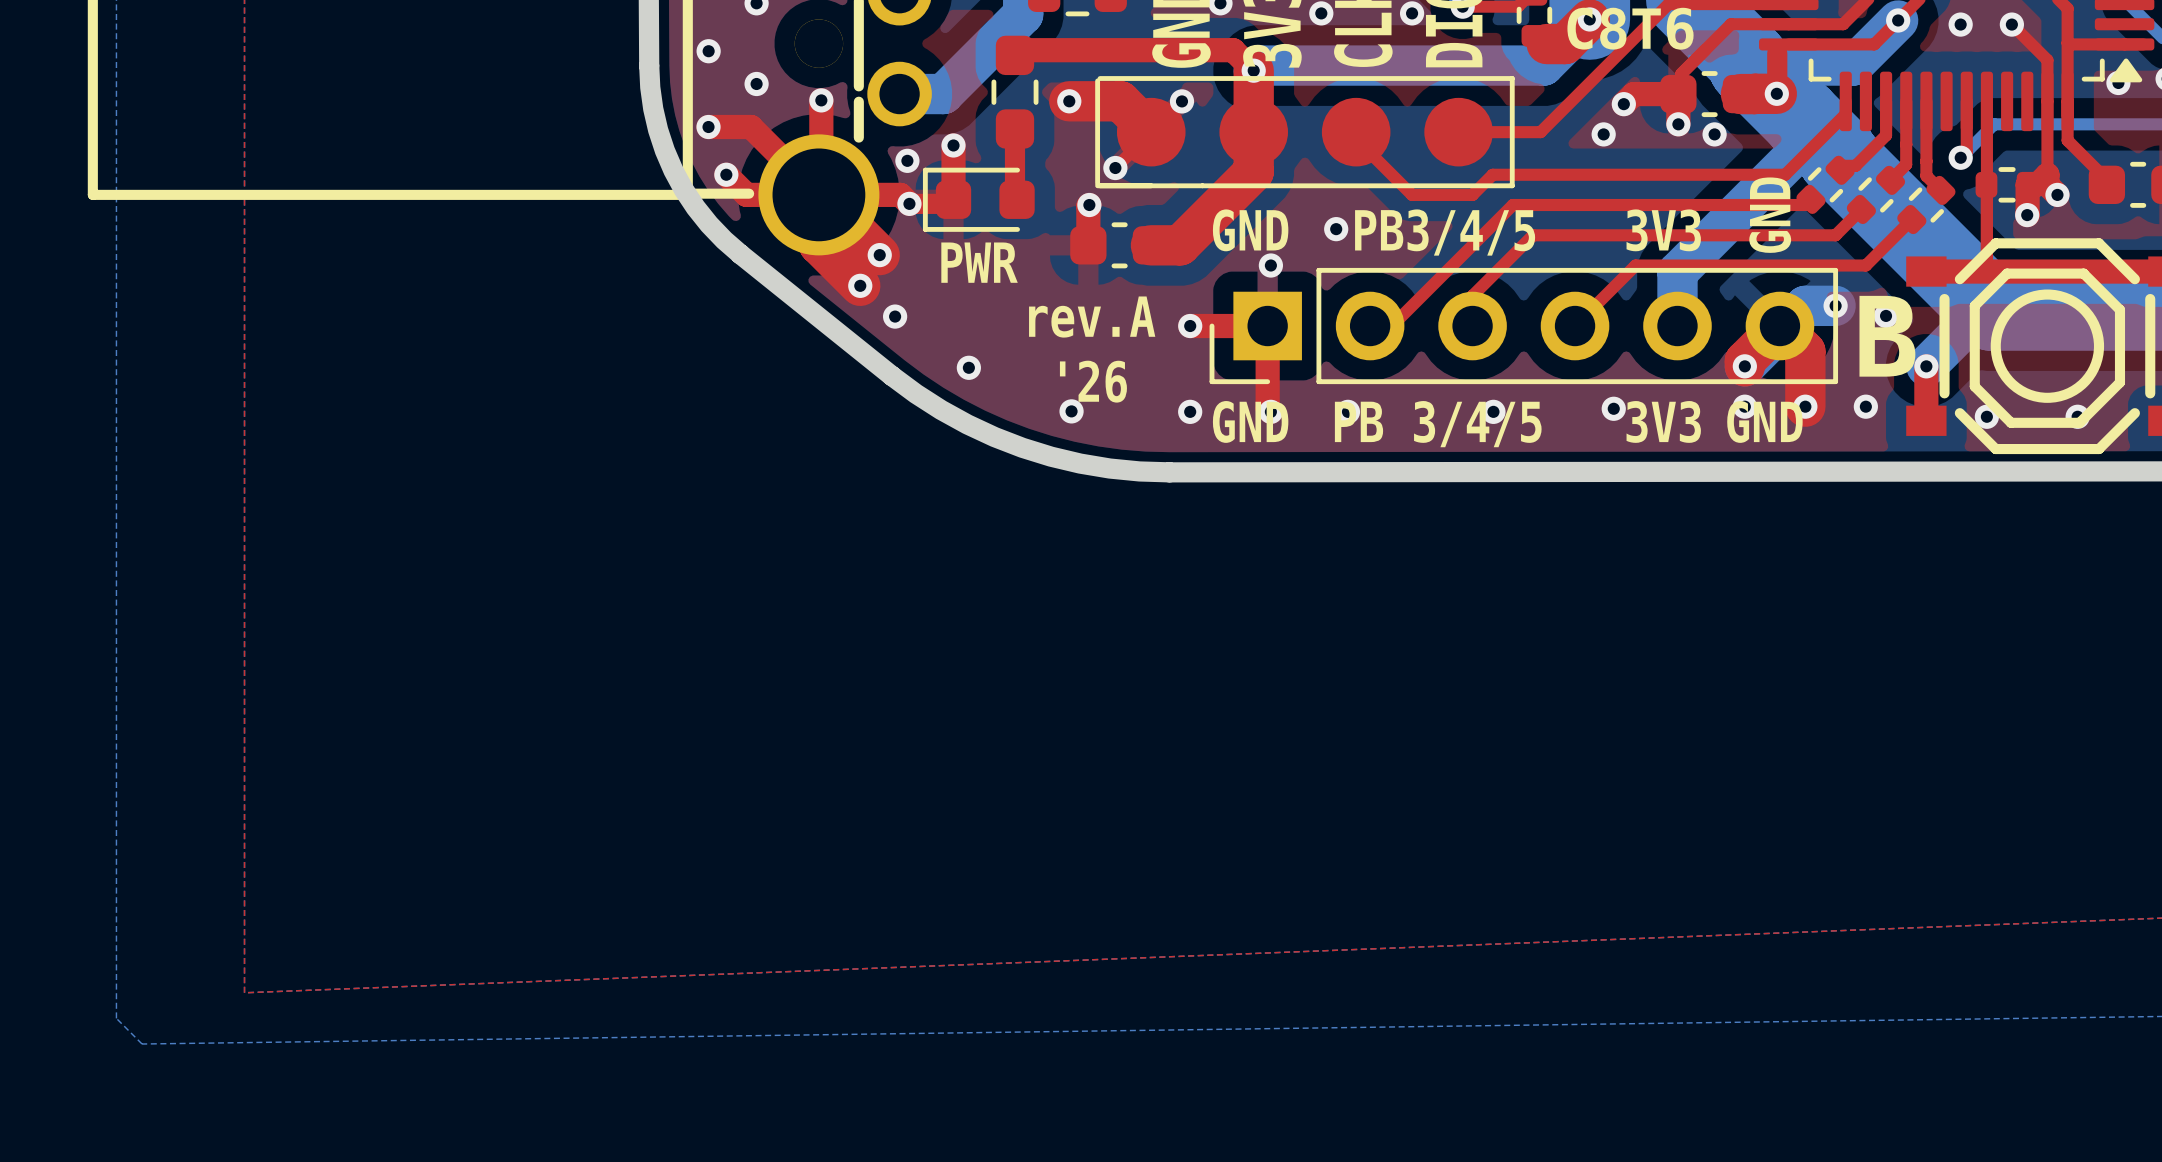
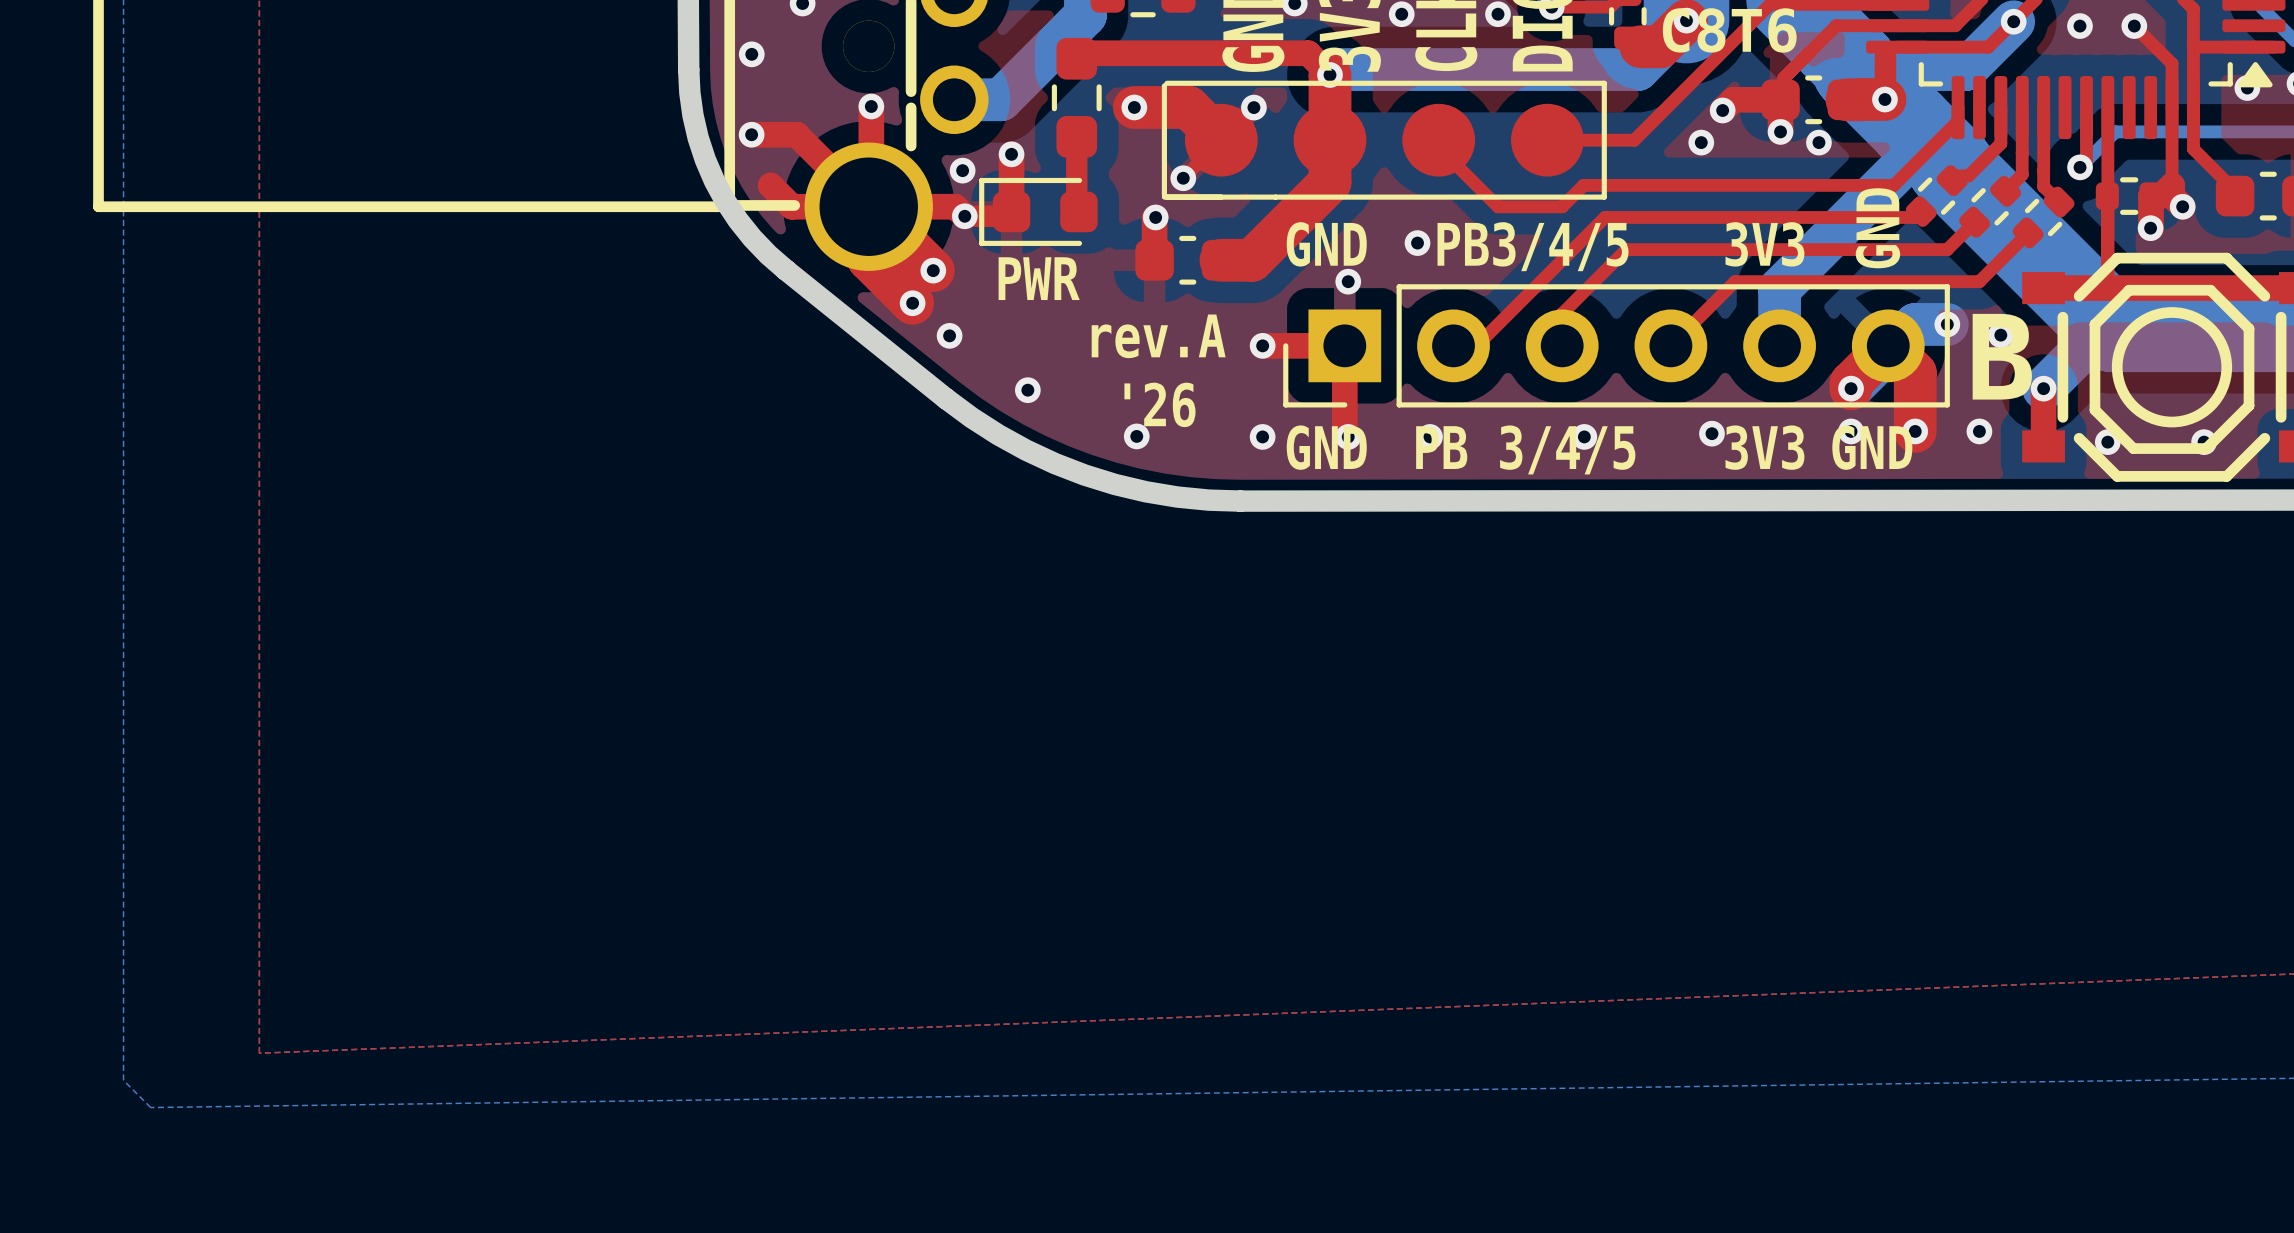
via: (756, 83) -> none
via: (726, 174) -> none

